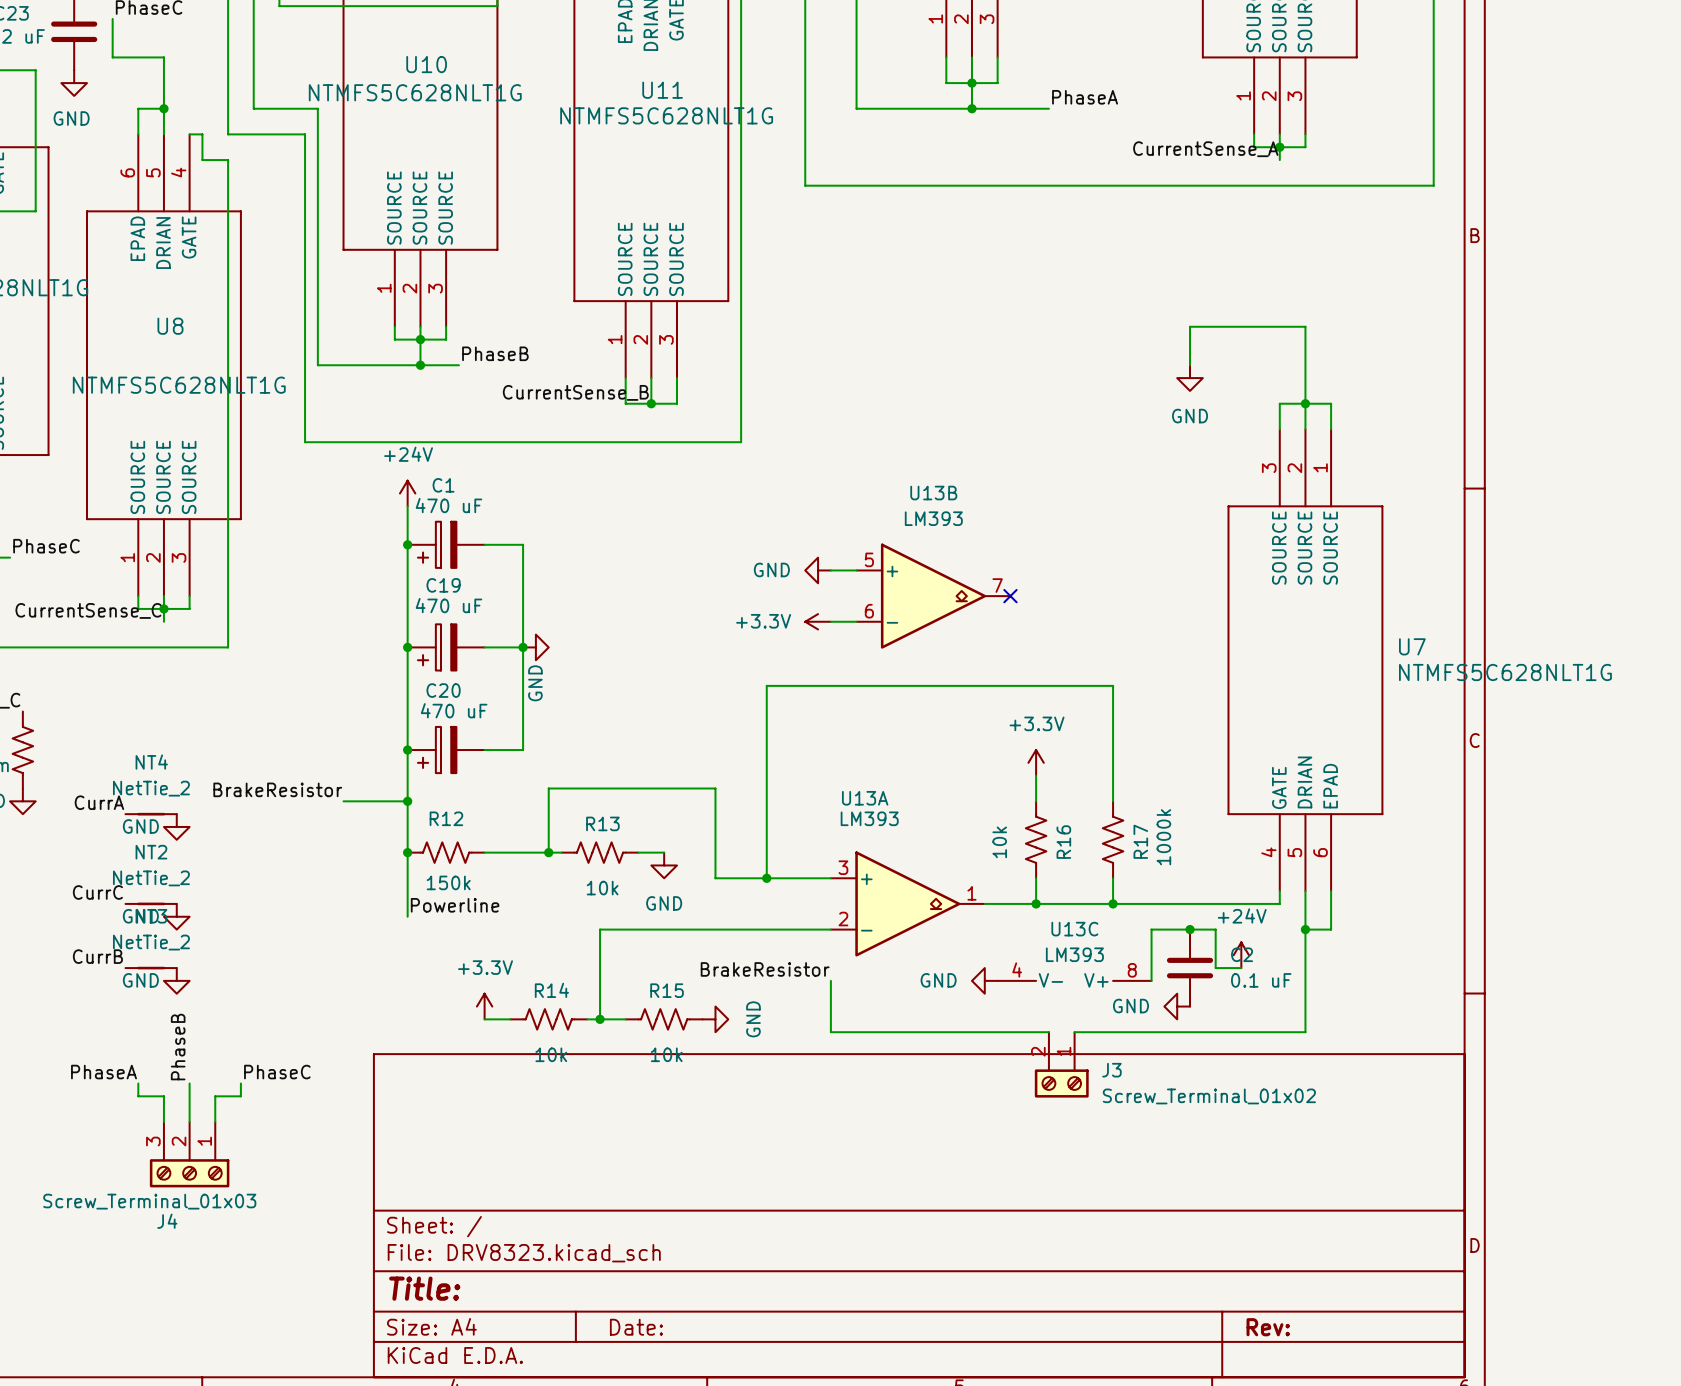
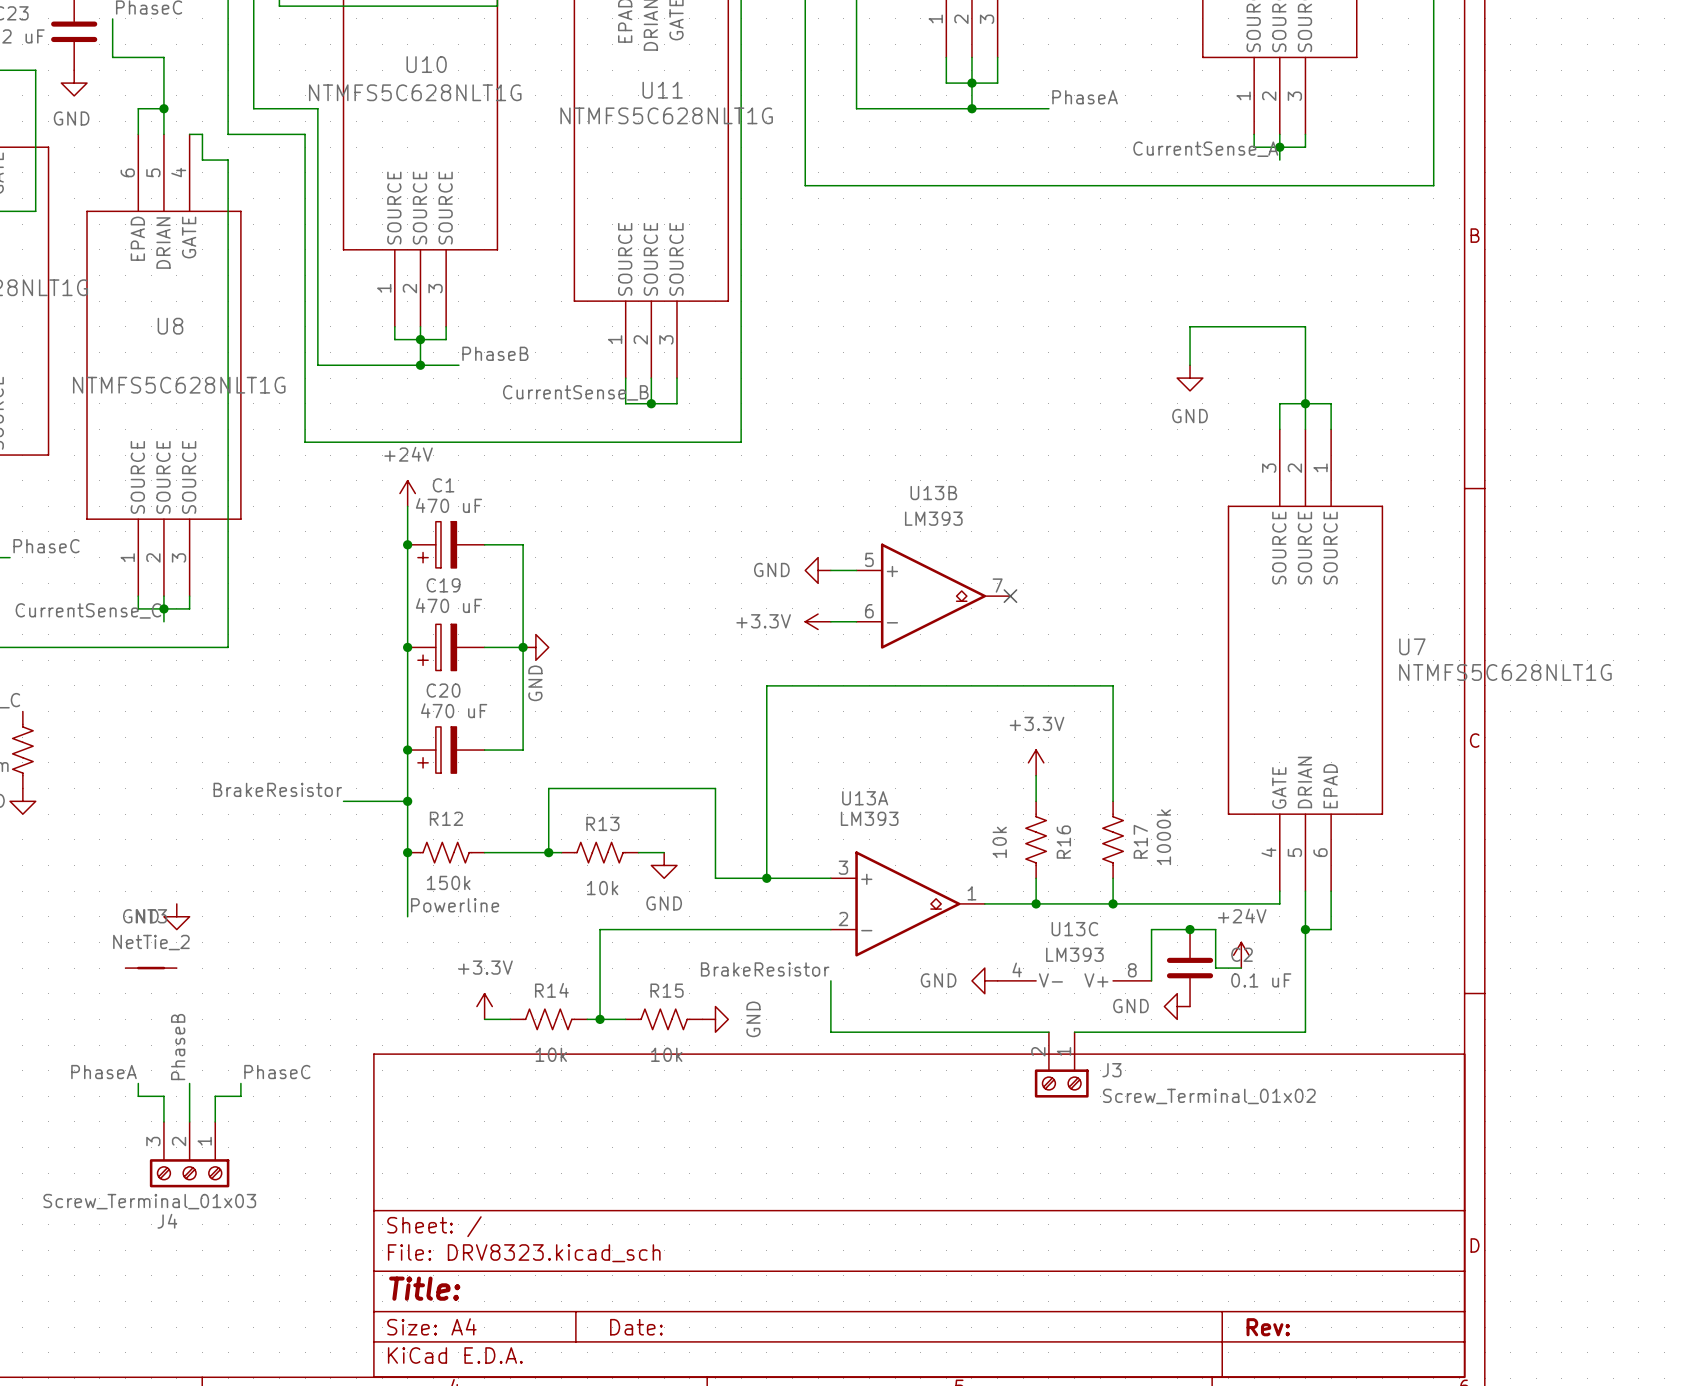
label: CurrA (99, 802) -> none
NT4: NetTie_2 (151, 814) -> none
power symbol: GND (176, 826) -> none
label: CurrC (97, 892) -> none
NT2: NetTie_2 (151, 903) -> none
label: CurrB (97, 956) -> none
power symbol: GND (176, 980) -> none

